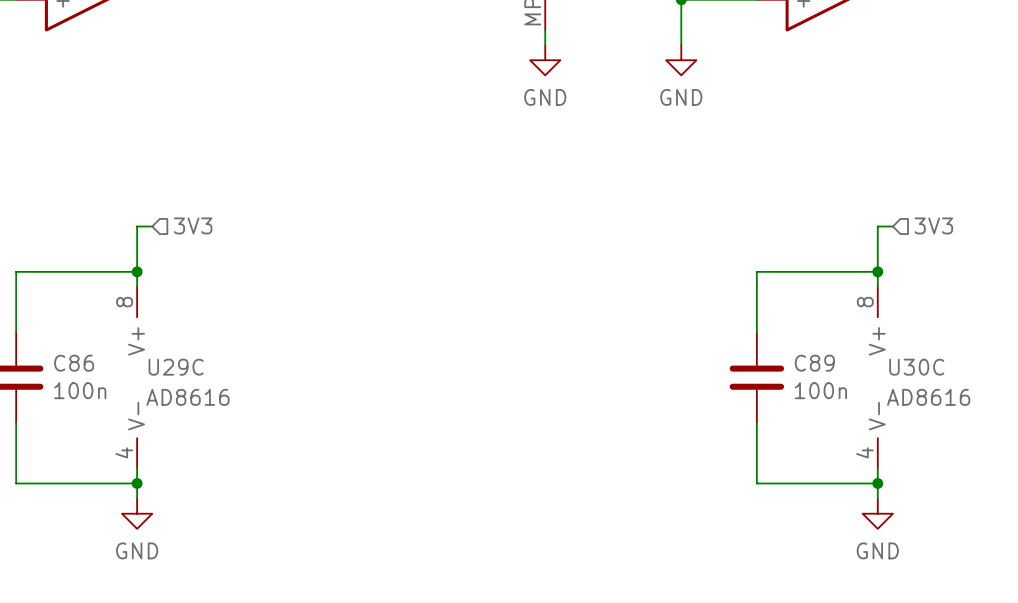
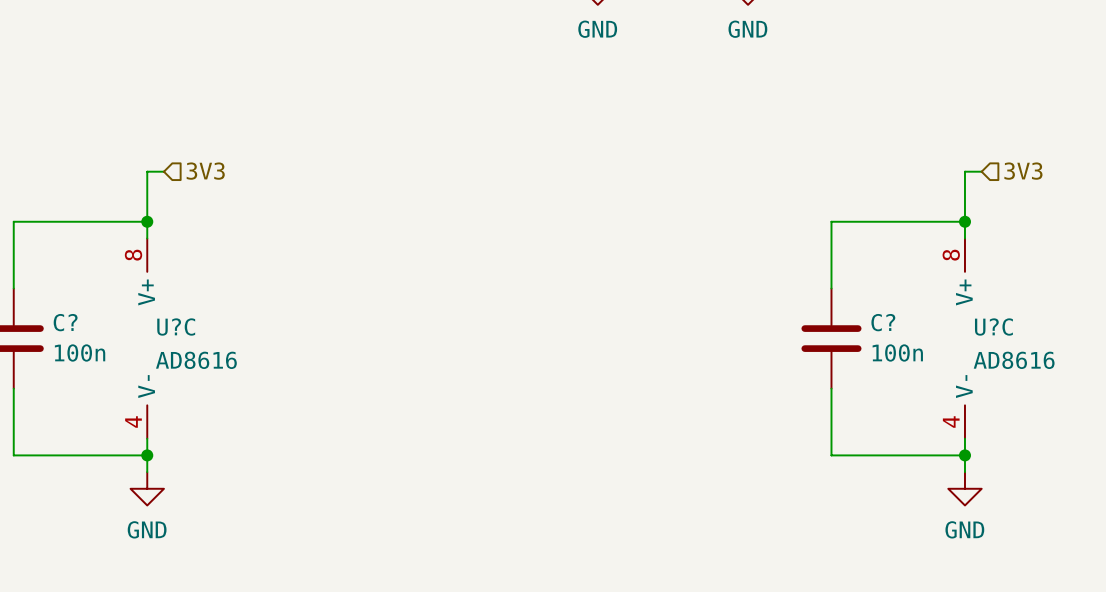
C86 name: C86 (74, 363) -> C? (65, 322)
C89 name: C89 (814, 363) -> C? (883, 322)
U29C name: U29C (176, 367) -> U?C (176, 327)
U30C name: U30C (916, 367) -> U?C (993, 327)

